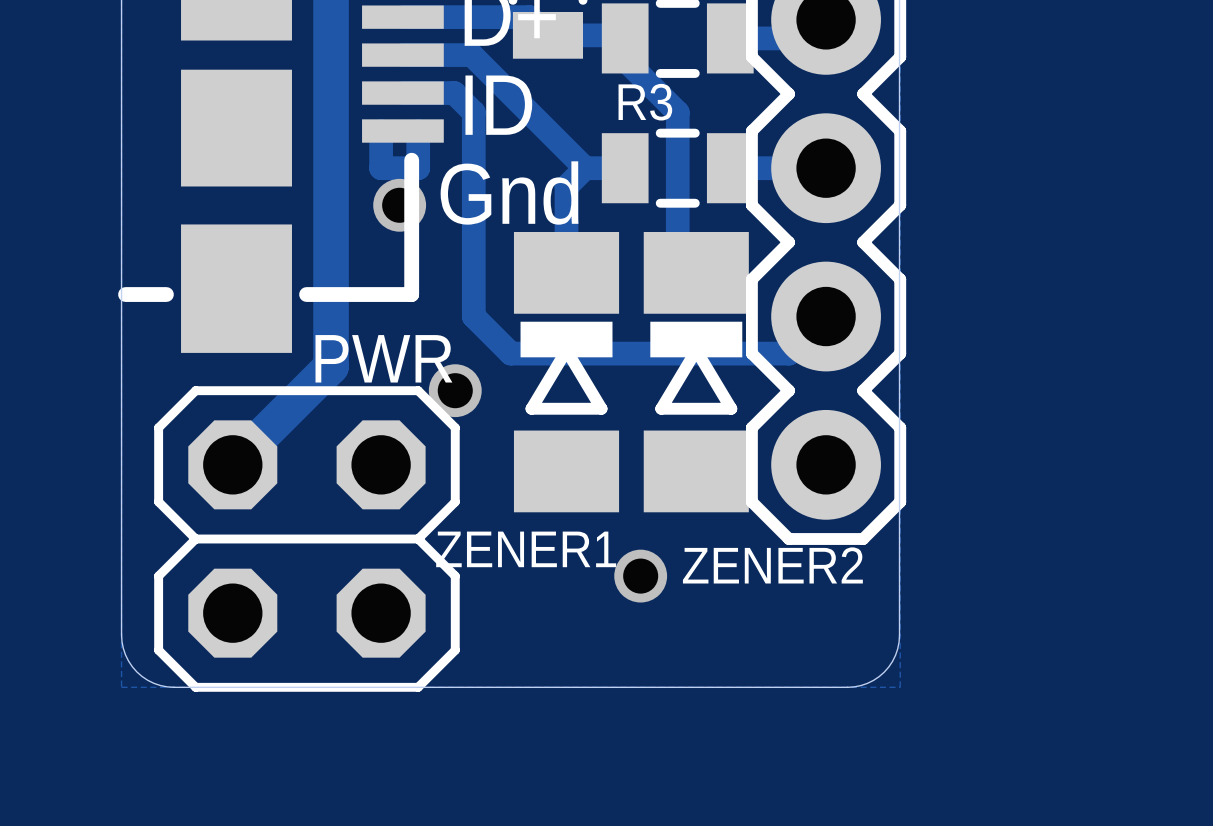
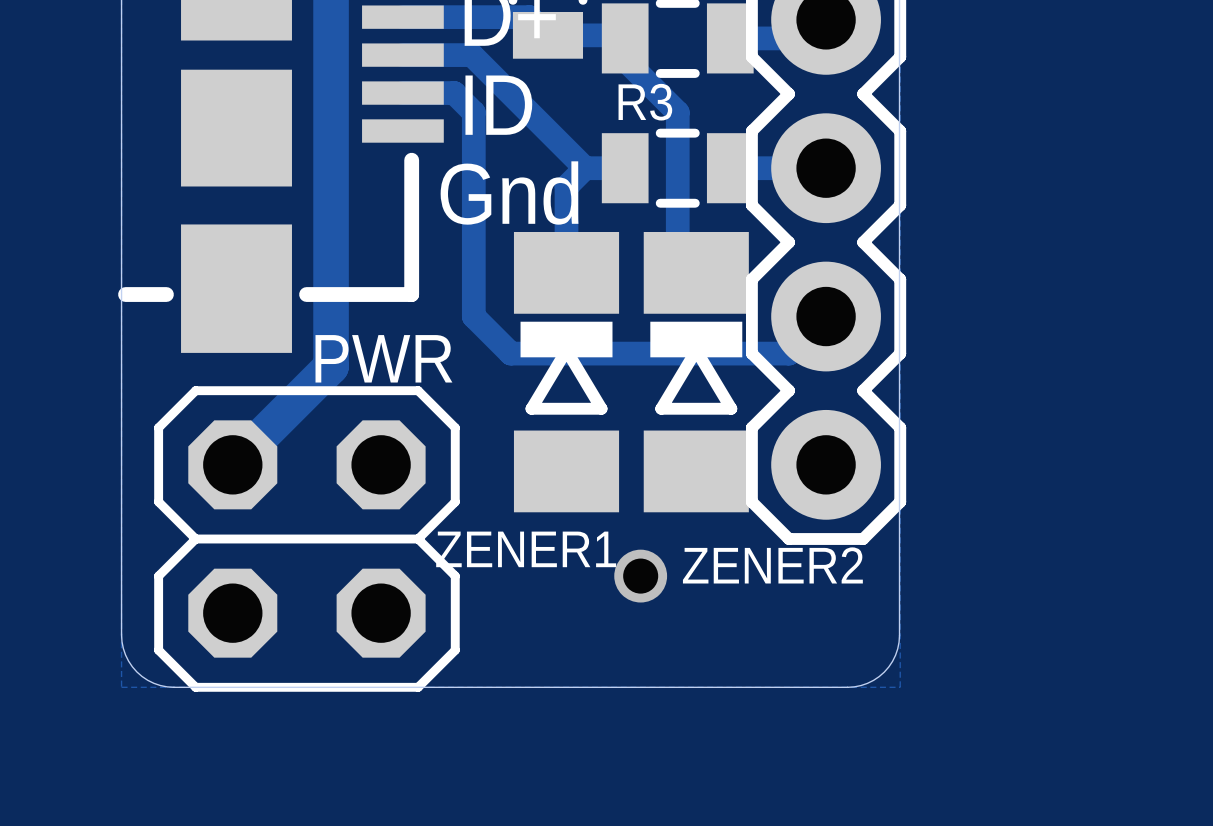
track: (381, 131) (381, 168) (418, 168) (418, 131) -> none
via: (399, 205) -> none
via: (455, 390) -> none

